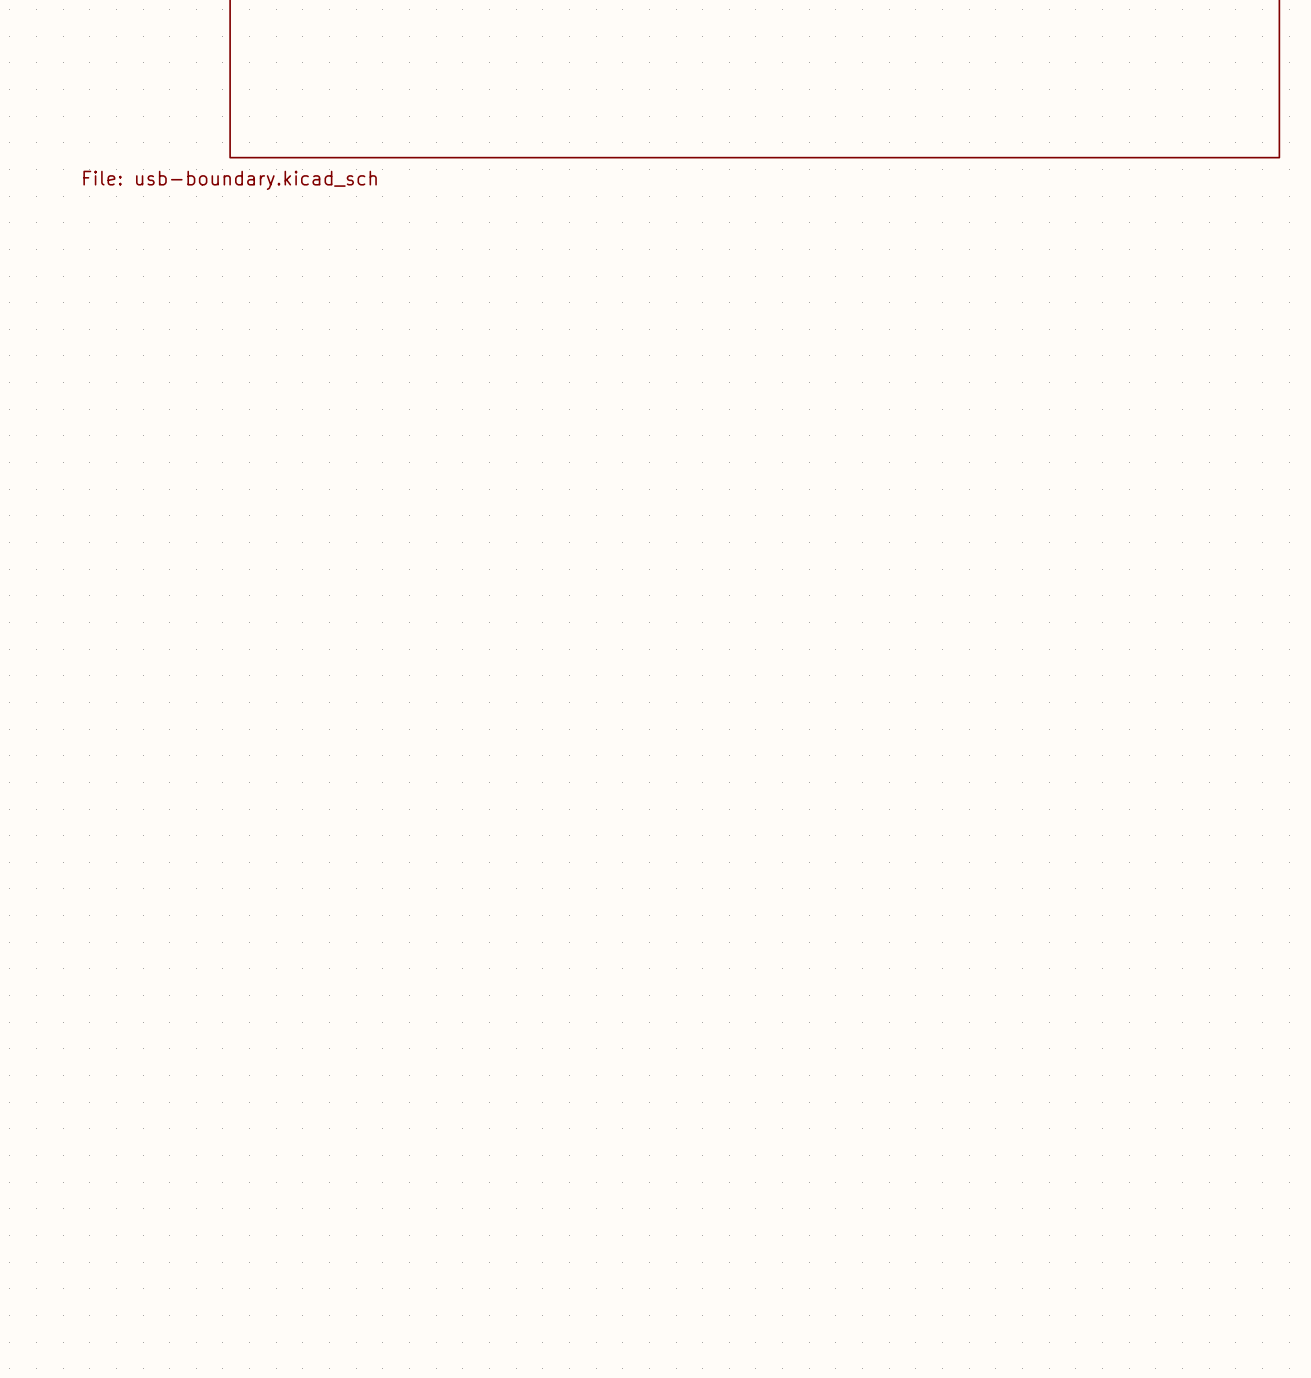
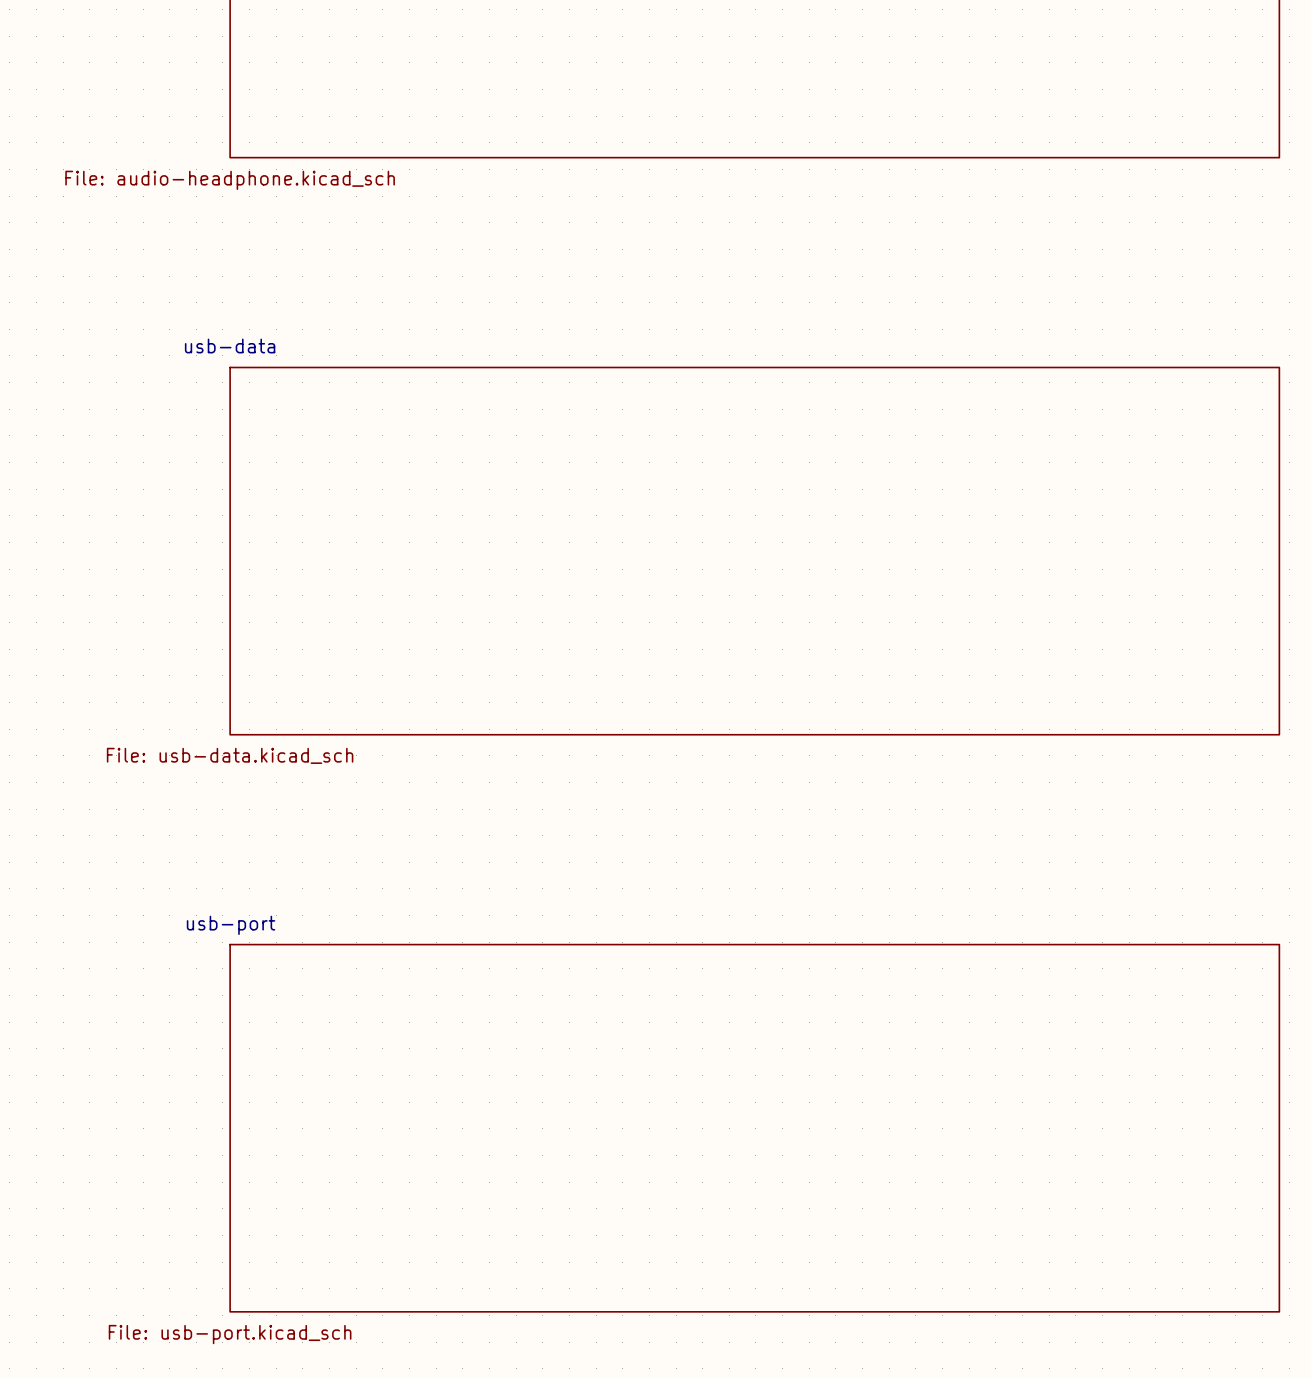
sheet value: File: usb-boundary.kicad_sch (230, 180) -> File: audio-headphone.kicad_sch (230, 180)
sheet usb-data: none -> File: usb-data.kicad_sch (754, 551)
sheet usb-port: none -> File: usb-port.kicad_sch (754, 1128)

